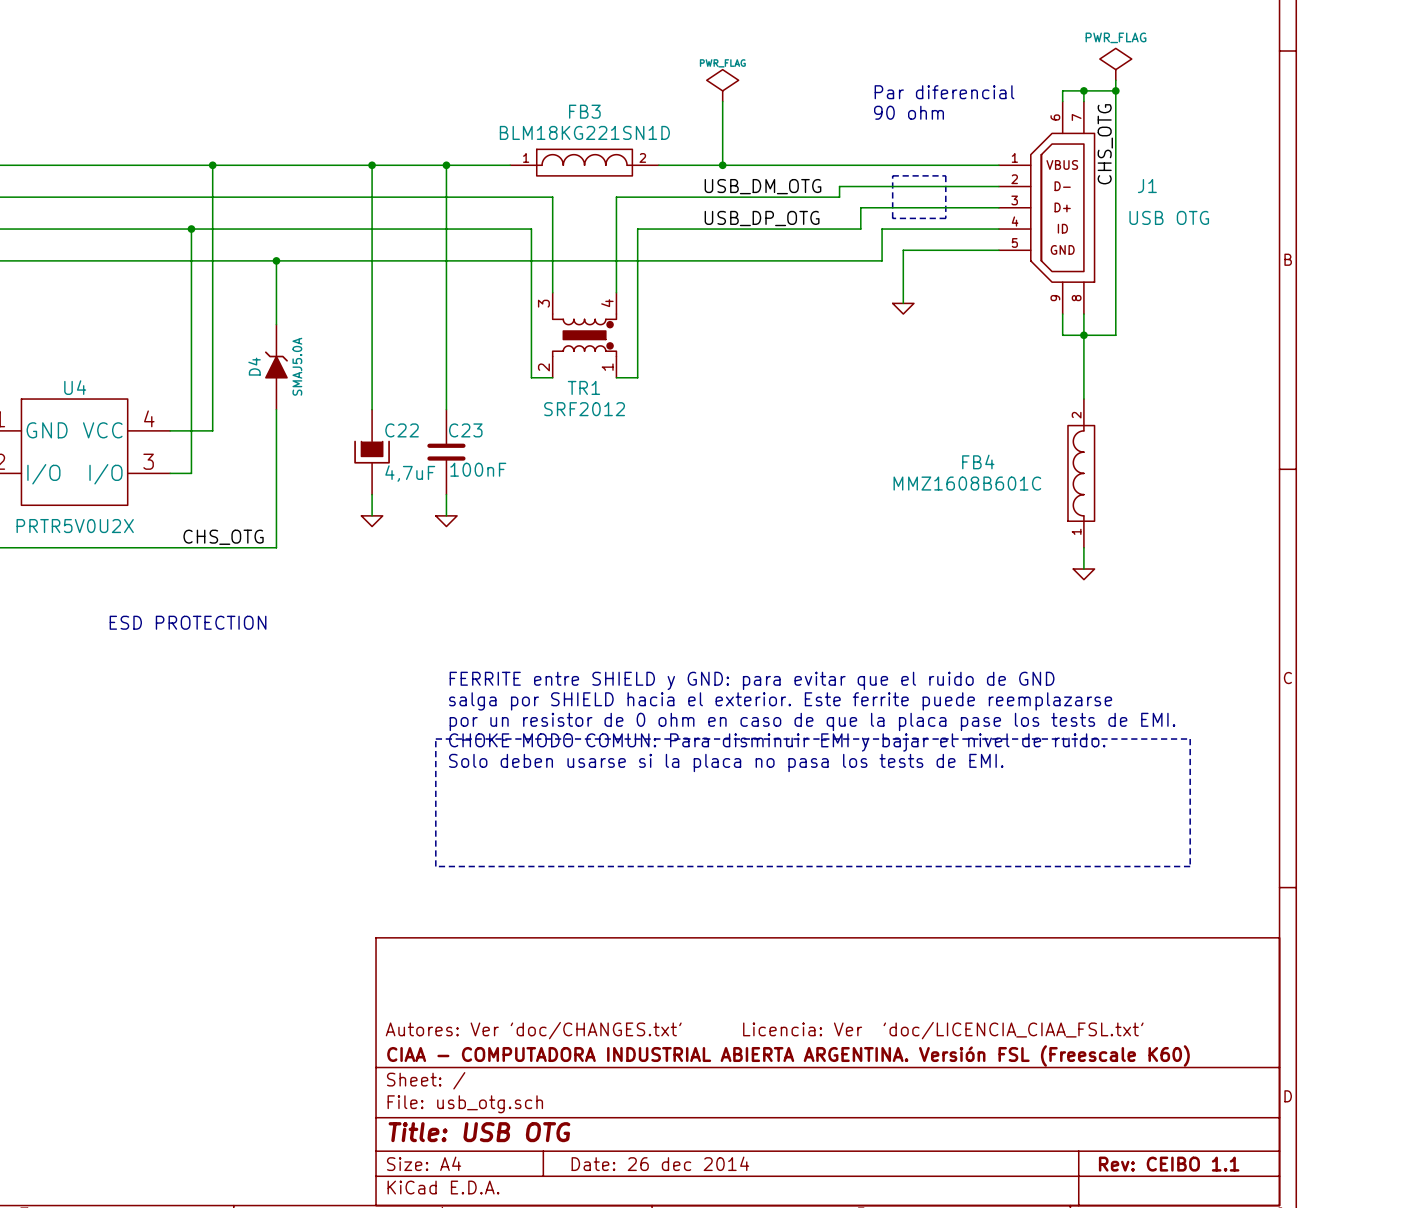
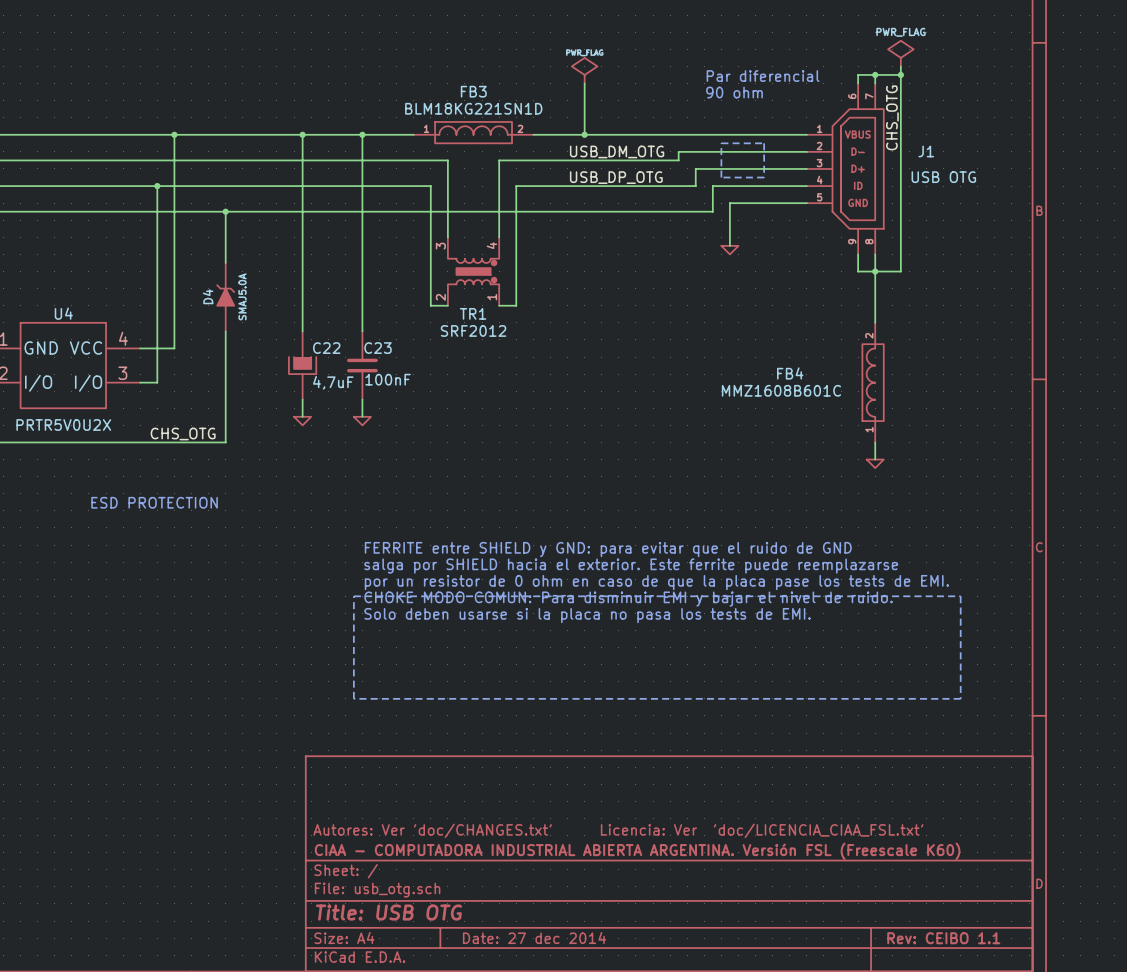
title block: Date: 26 dec 2014 (660, 1163) -> Date: 27 dec 2014 (534, 937)

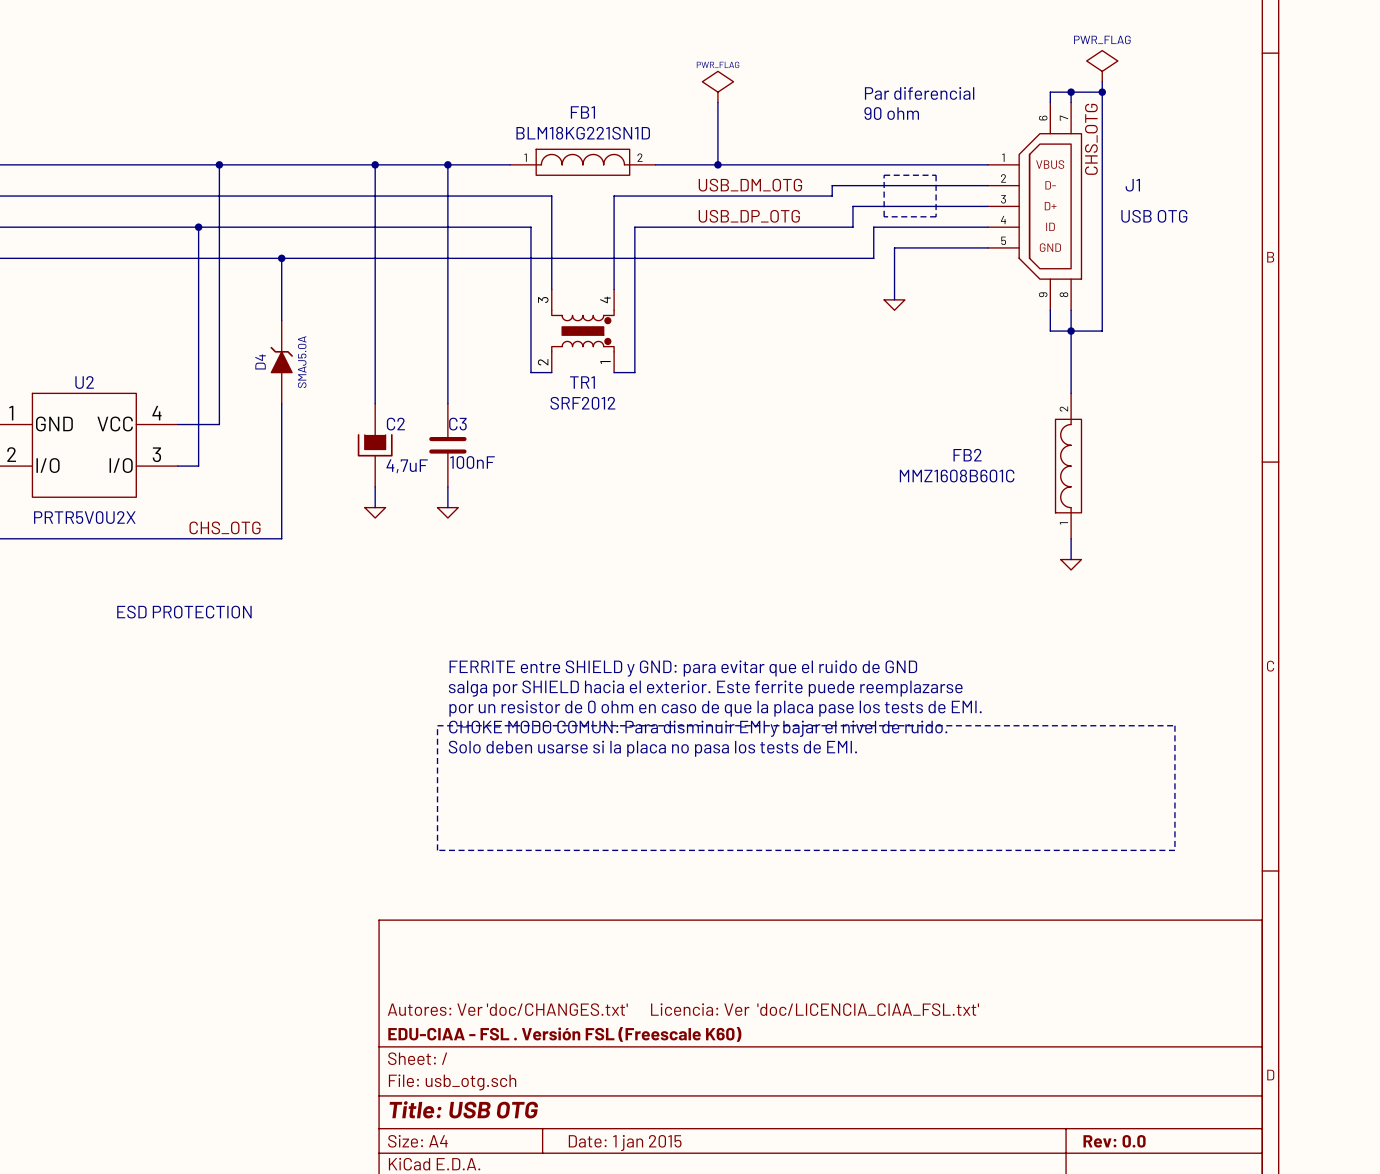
FB3 name: FB3 (473, 91) -> FB1 (582, 112)
U4 name: U4 (63, 313) -> U2 (84, 382)
C22 name: C22 (326, 348) -> C2 (395, 424)
C23 name: C23 (378, 348) -> C3 (457, 424)
FB4 name: FB4 (790, 373) -> FB2 (967, 455)
title block: CIAA - COMPUTADORA INDUSTRIAL ABIERTA ARGENTINA. Versión FSL (Freescale K60) (637, 851) -> EDU-CIAA - FSL . Versión FSL (Freescale K60) (564, 1034)
title block: Date: 27 dec 2014 (534, 937) -> Date: 1 jan 2015 (625, 1143)
title block: Rev: CEIBO 1.1 (943, 938) -> Rev: 0.0 (1114, 1141)

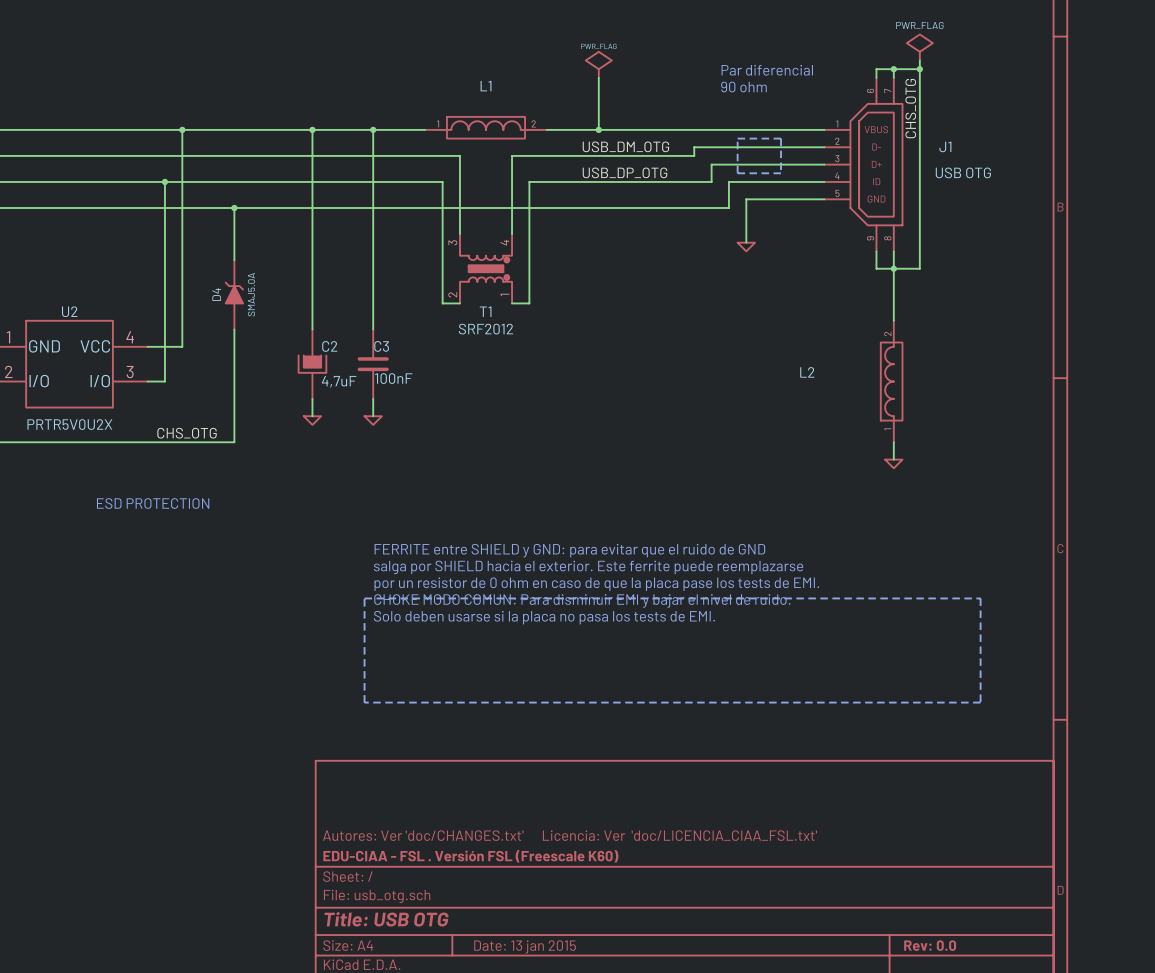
FB1 name: FB1 (582, 112) -> L1 (486, 86)
FB1 value: BLM18KG221SN1D (583, 133) -> none
TR1 name: TR1 (582, 382) -> T1 (485, 311)
FB2 name: FB2 (967, 455) -> L2 (807, 372)
FB2 value: MMZ1608B601C (957, 476) -> none
title block: Date: 1 jan 2015 (625, 1143) -> Date: 13 jan 2015 (525, 947)

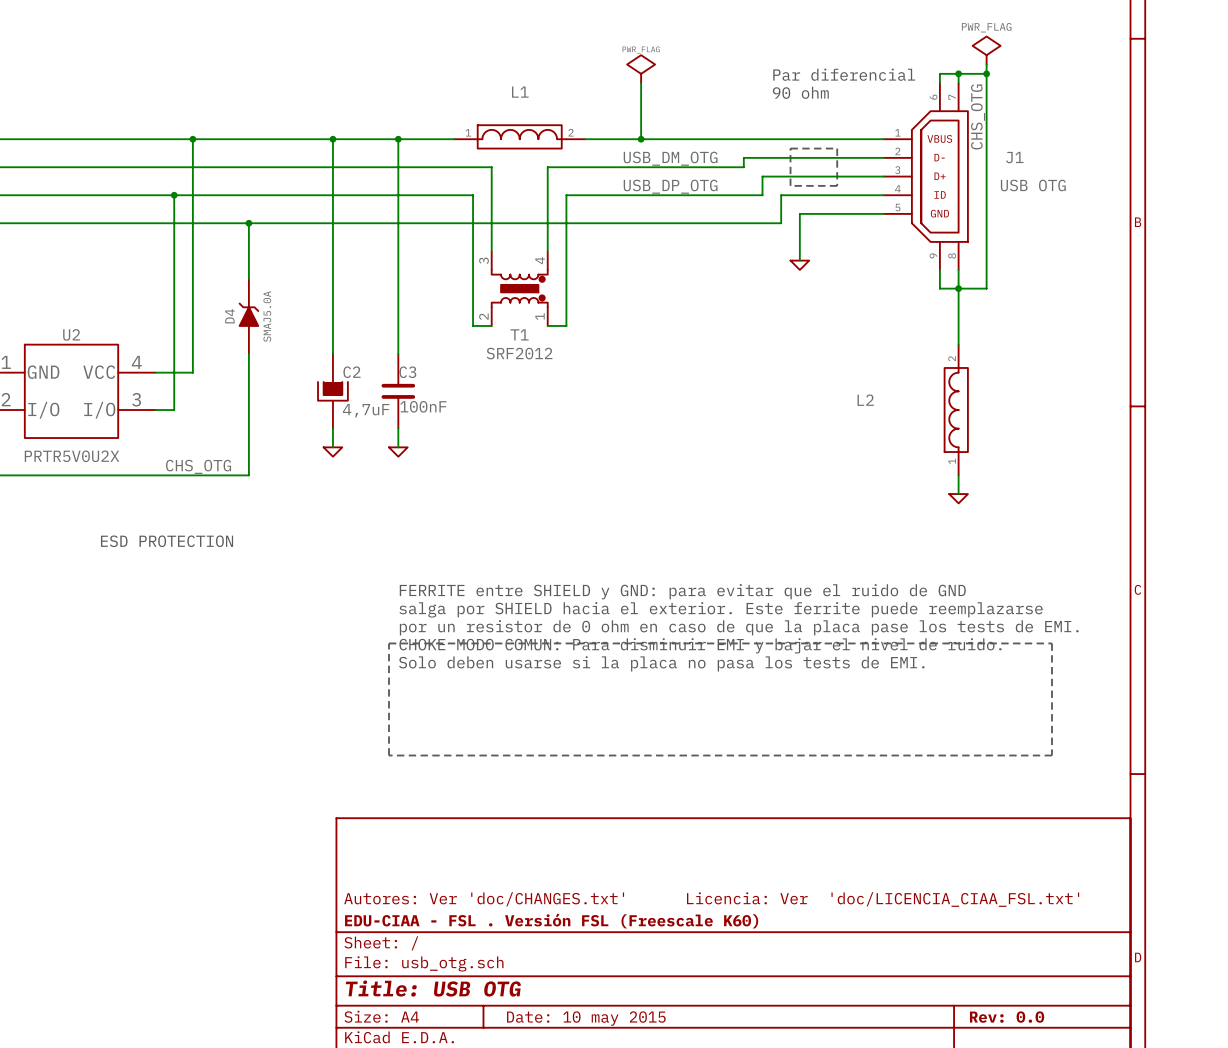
title block: Date: 13 jan 2015 (525, 947) -> Date: 10 may 2015 (586, 1018)

